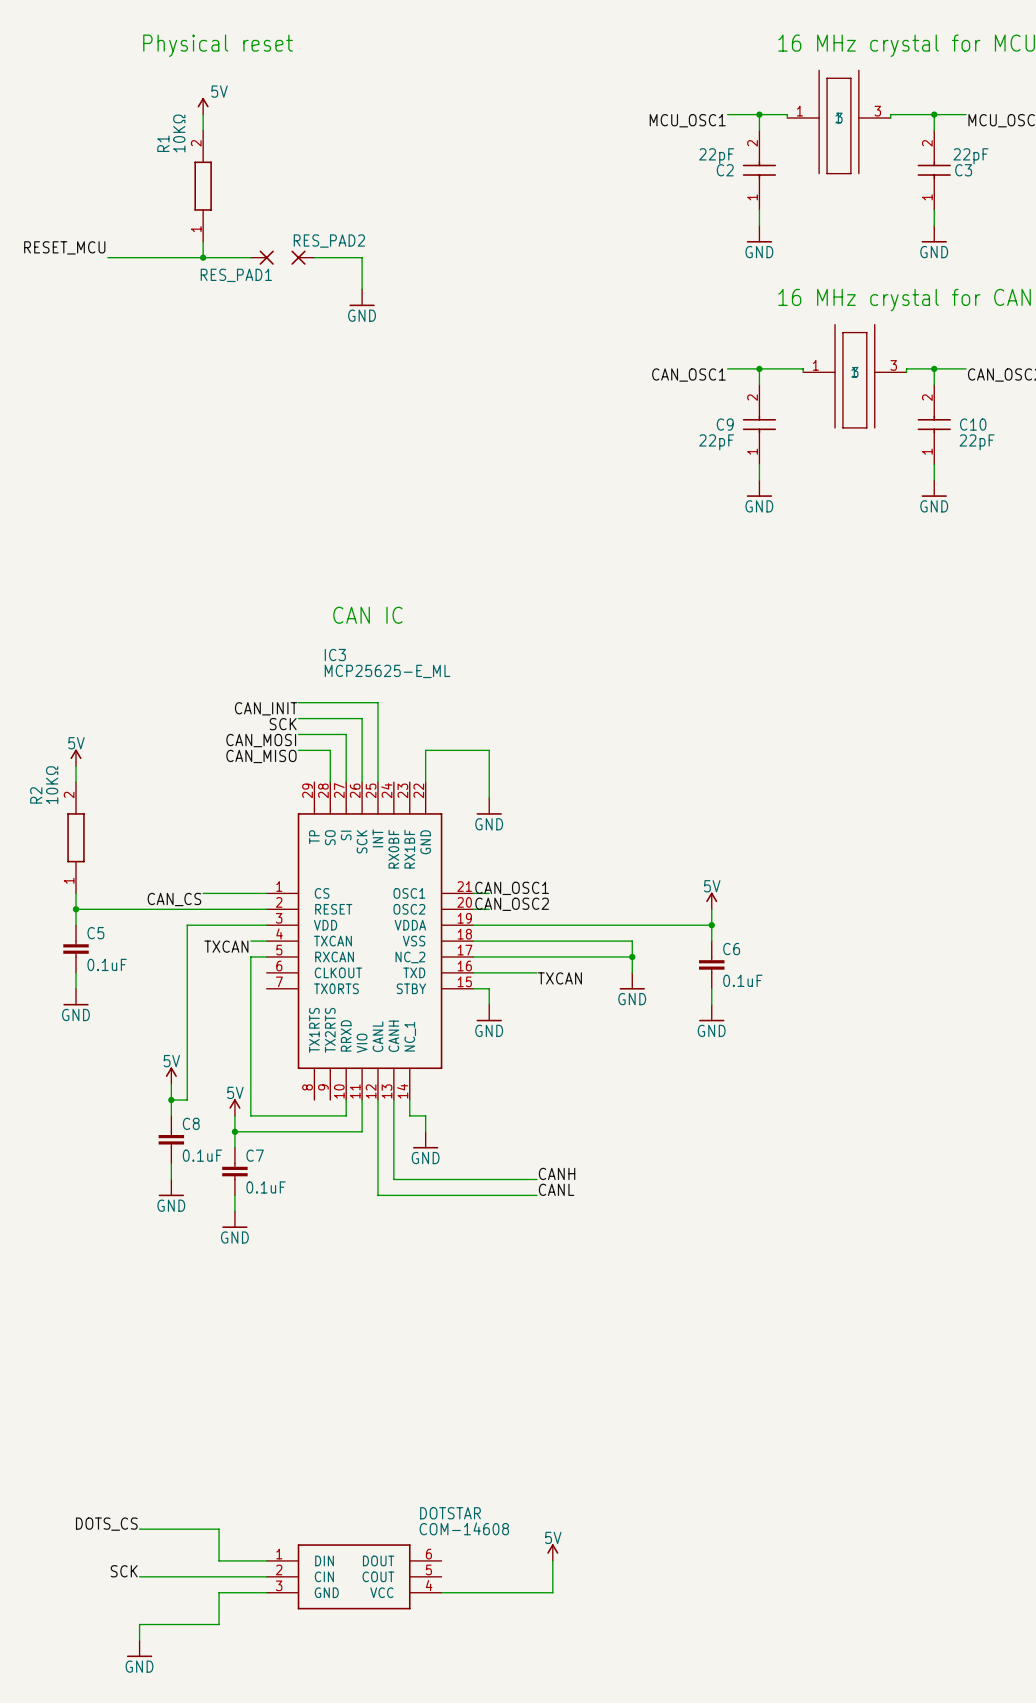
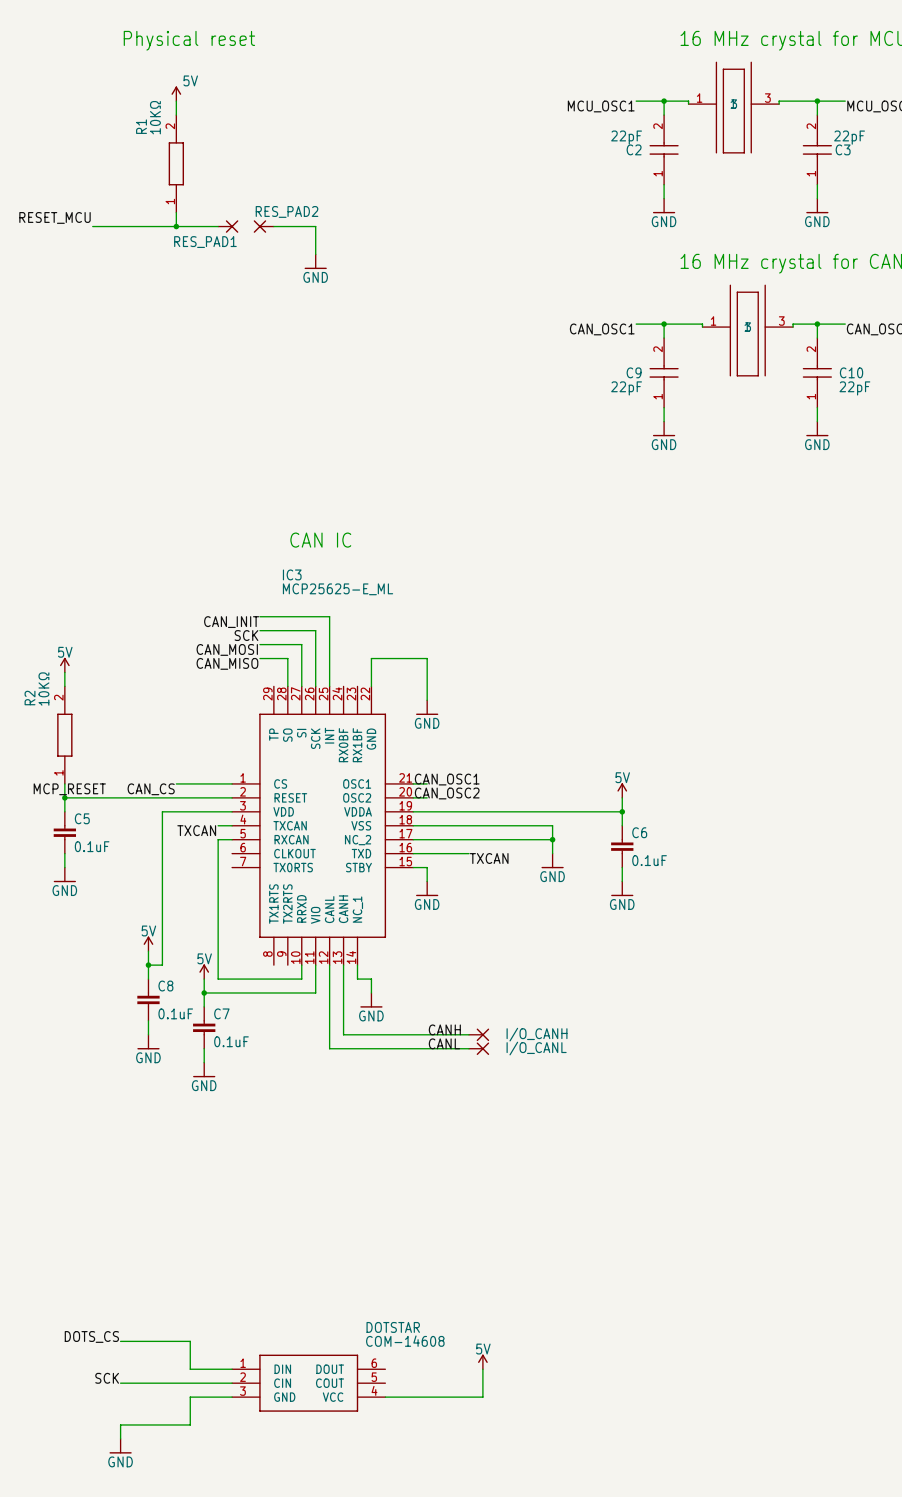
label: none -> MCP_RESET (69, 789)
label position: CANH (557, 1173) -> CANH (444, 1029)
I/O_CANH: none -> (479, 1034)
label position: CANL (556, 1189) -> CANL (444, 1043)
I/O_CANL: none -> (479, 1048)

